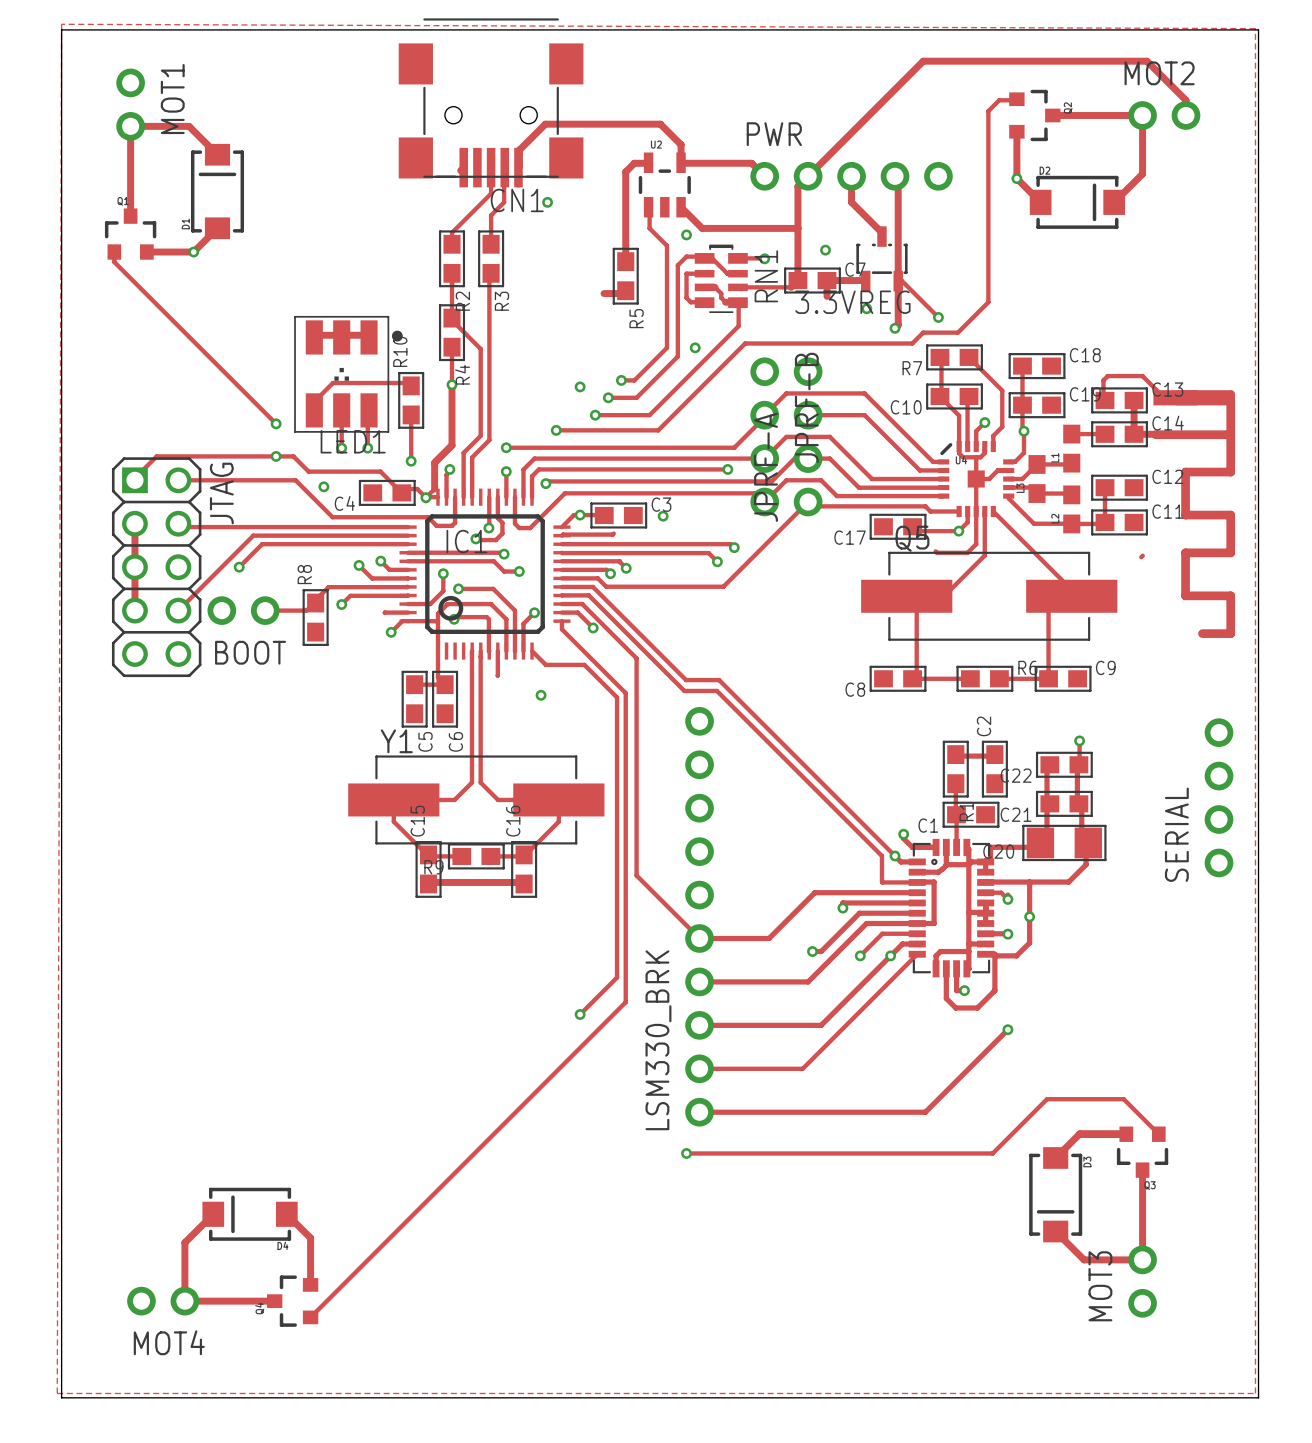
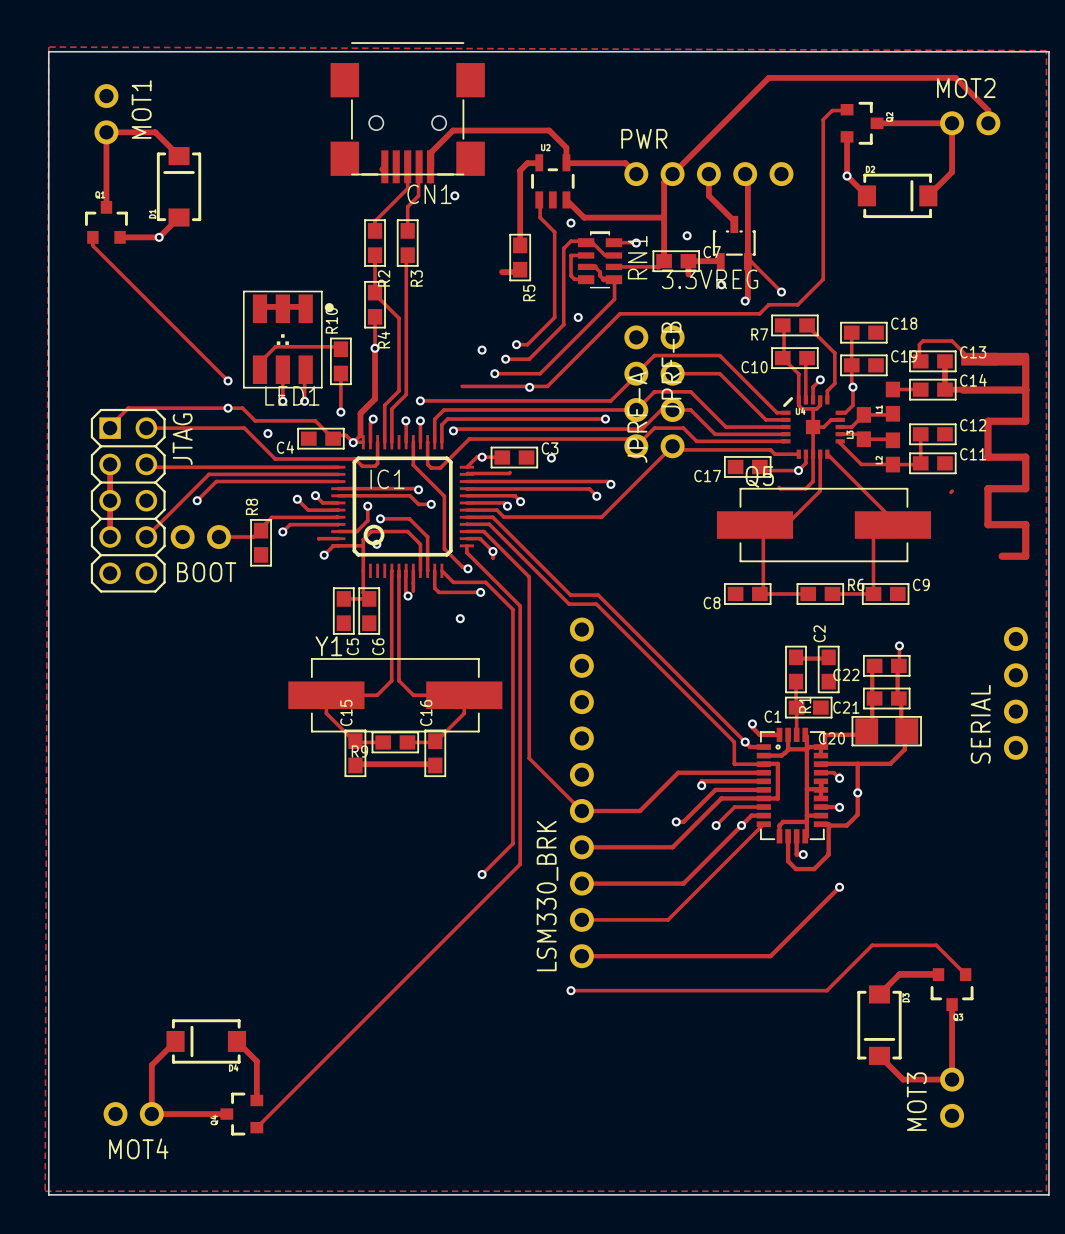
via: (556, 430) -> none
via: none -> (529, 387)
via: none -> (405, 420)
track: (489, 497) (488, 528) -> (406, 442) (405, 420)
track: (497, 518) (502, 522) (502, 533) (495, 540) (475, 538) -> (413, 459) (413, 465) (444, 496) (444, 548) (462, 566) (467, 566) (467, 568)
via: (488, 528) -> none
via: (475, 538) -> none
track: (534, 612) (523, 623) (523, 651) -> (480, 592) (438, 592) (434, 588) (434, 570)
via: (534, 612) -> none
track: (454, 619) (456, 617) (486, 617) (488, 619) (488, 651) -> (408, 596) (405, 593) (405, 571)
track: none -> (492, 551) (492, 556)
via: none -> (467, 568)
via: none -> (480, 592)
via: none -> (408, 596)
via position: (541, 695) -> (460, 618)

